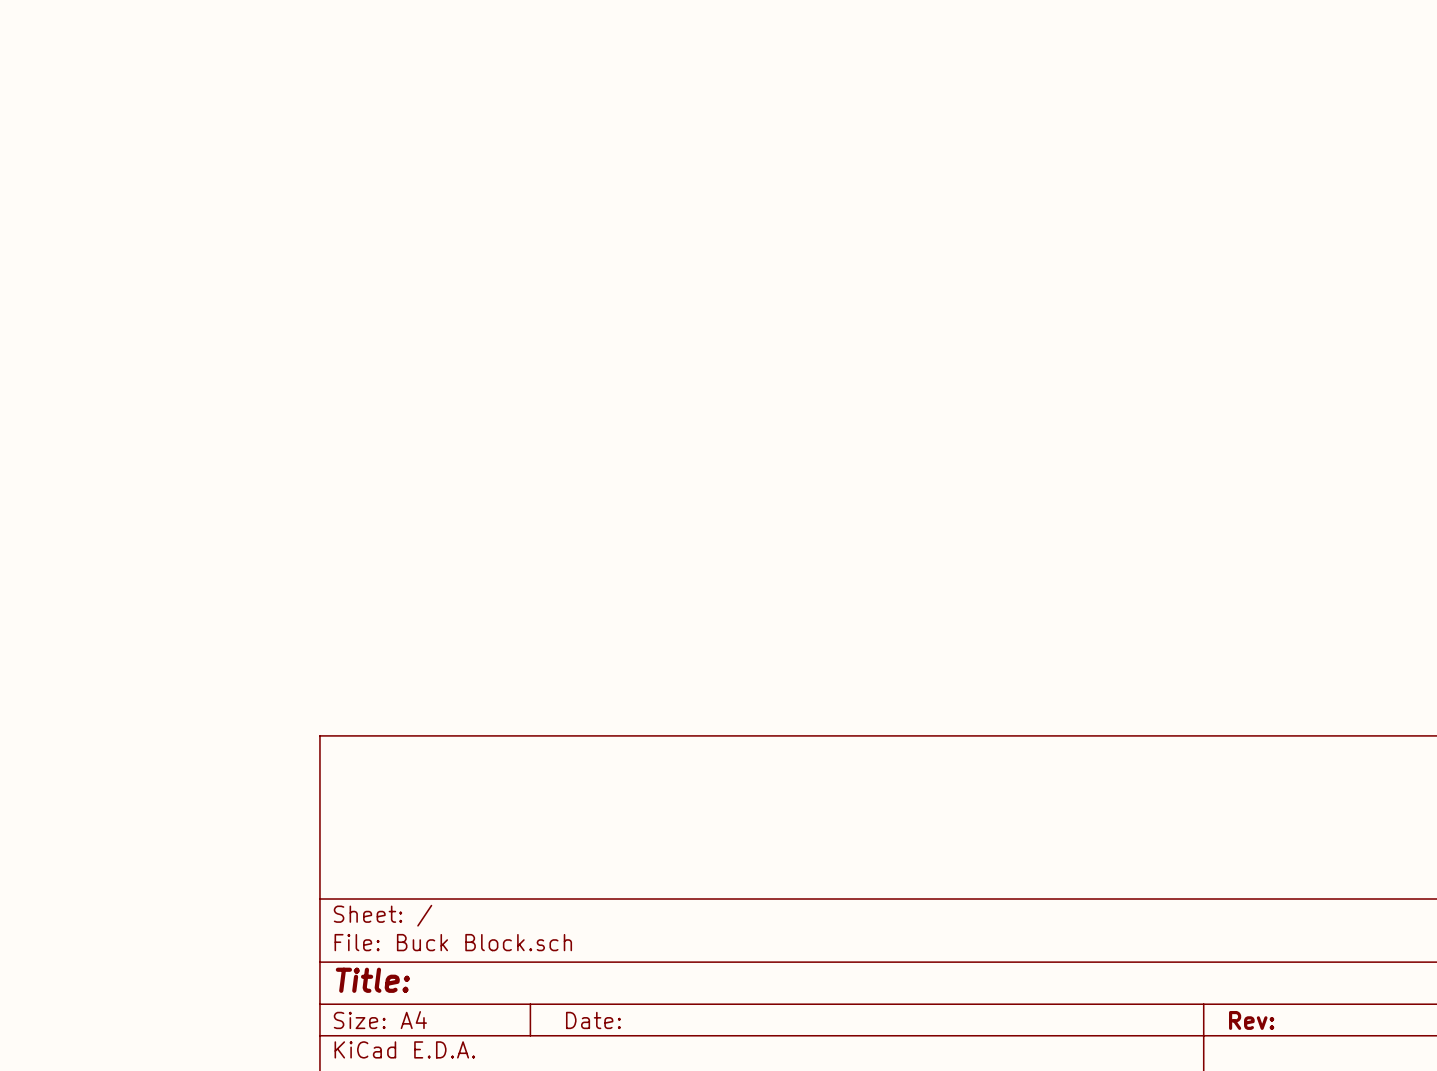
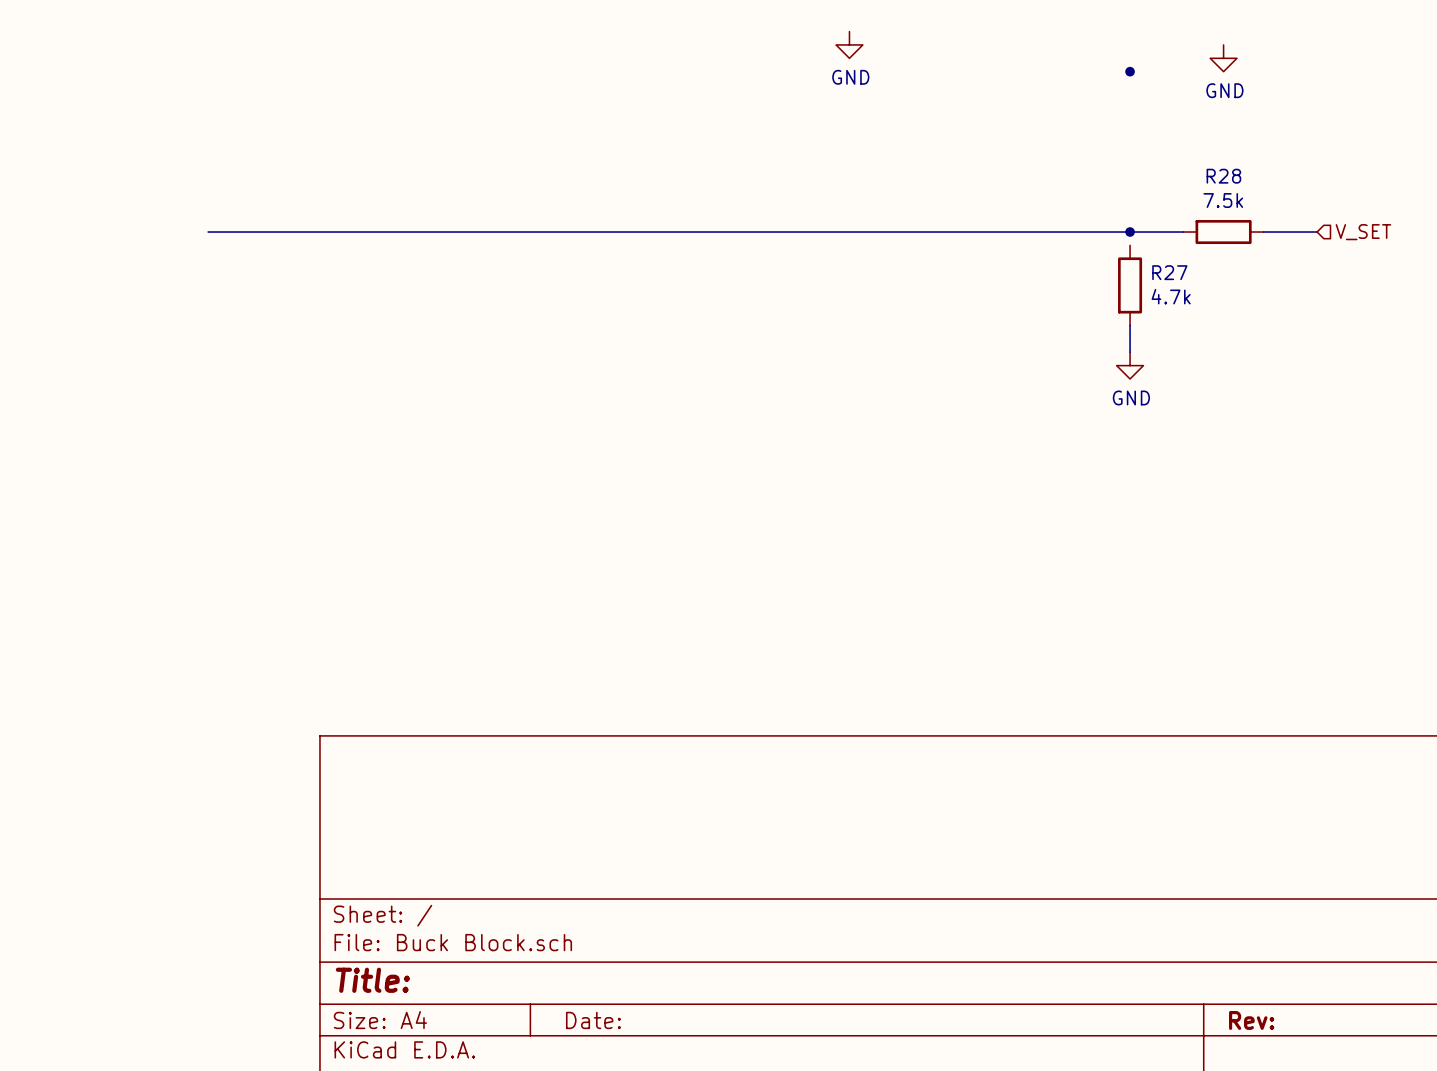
power symbol: none -> GND (849, 44)
power symbol: none -> GND (1223, 58)
junction: none -> (1130, 71)
wire: none -> (208, 232) (1183, 232)
junction: none -> (1130, 232)
R28: none -> 7.5k (1223, 232)
wire: none -> (1263, 232) (1317, 232)
hierarchical label: none -> V_SET (1363, 232)
R27: none -> 4.7k (1130, 285)
wire: none -> (1130, 325) (1130, 352)
power symbol: none -> GND (1130, 365)

